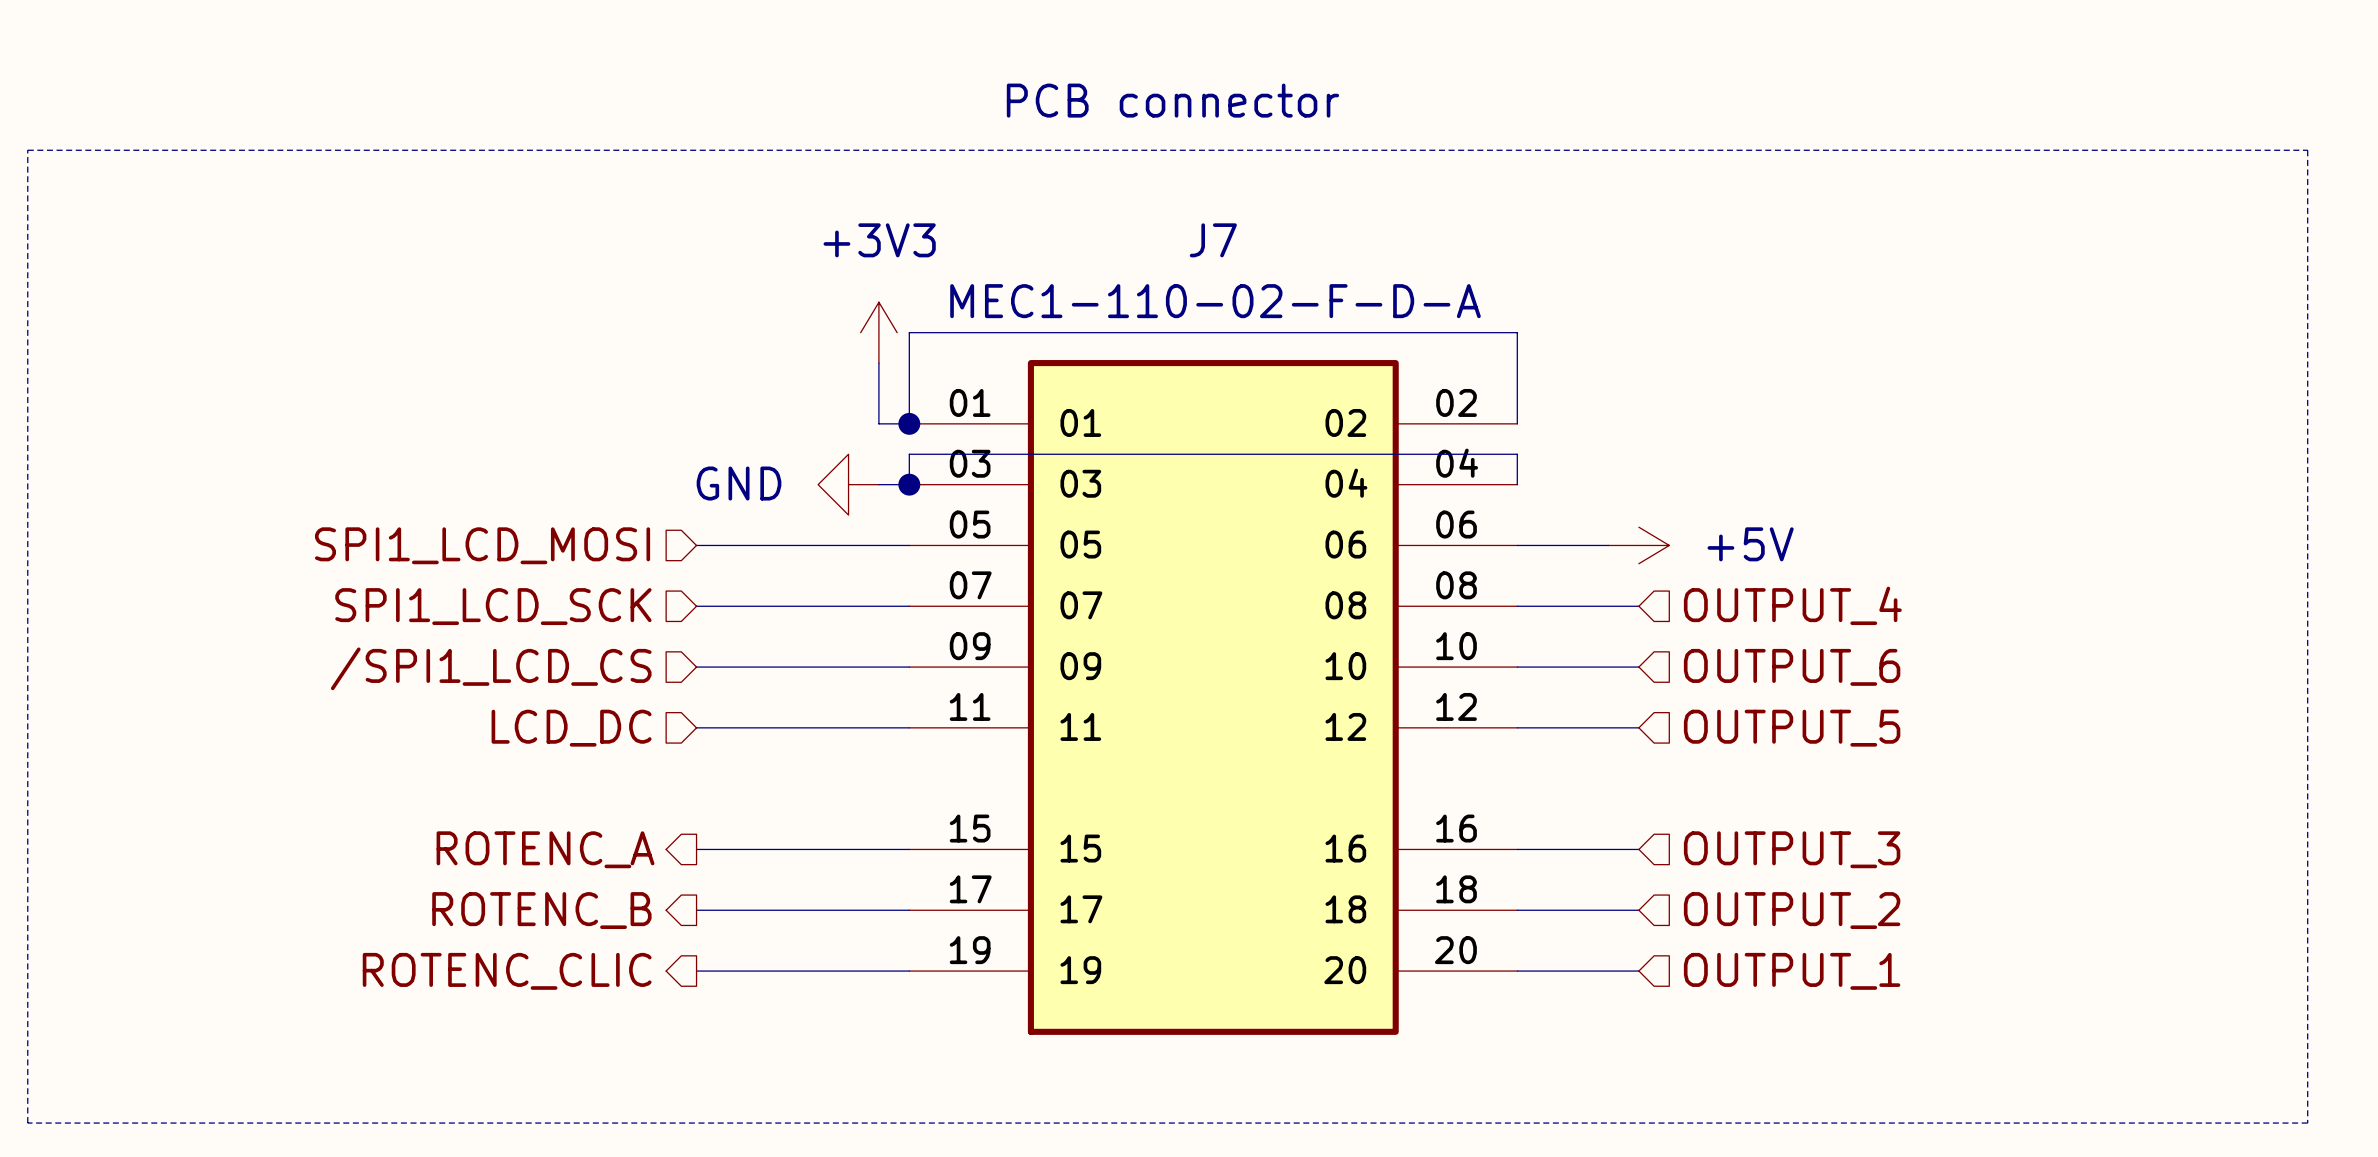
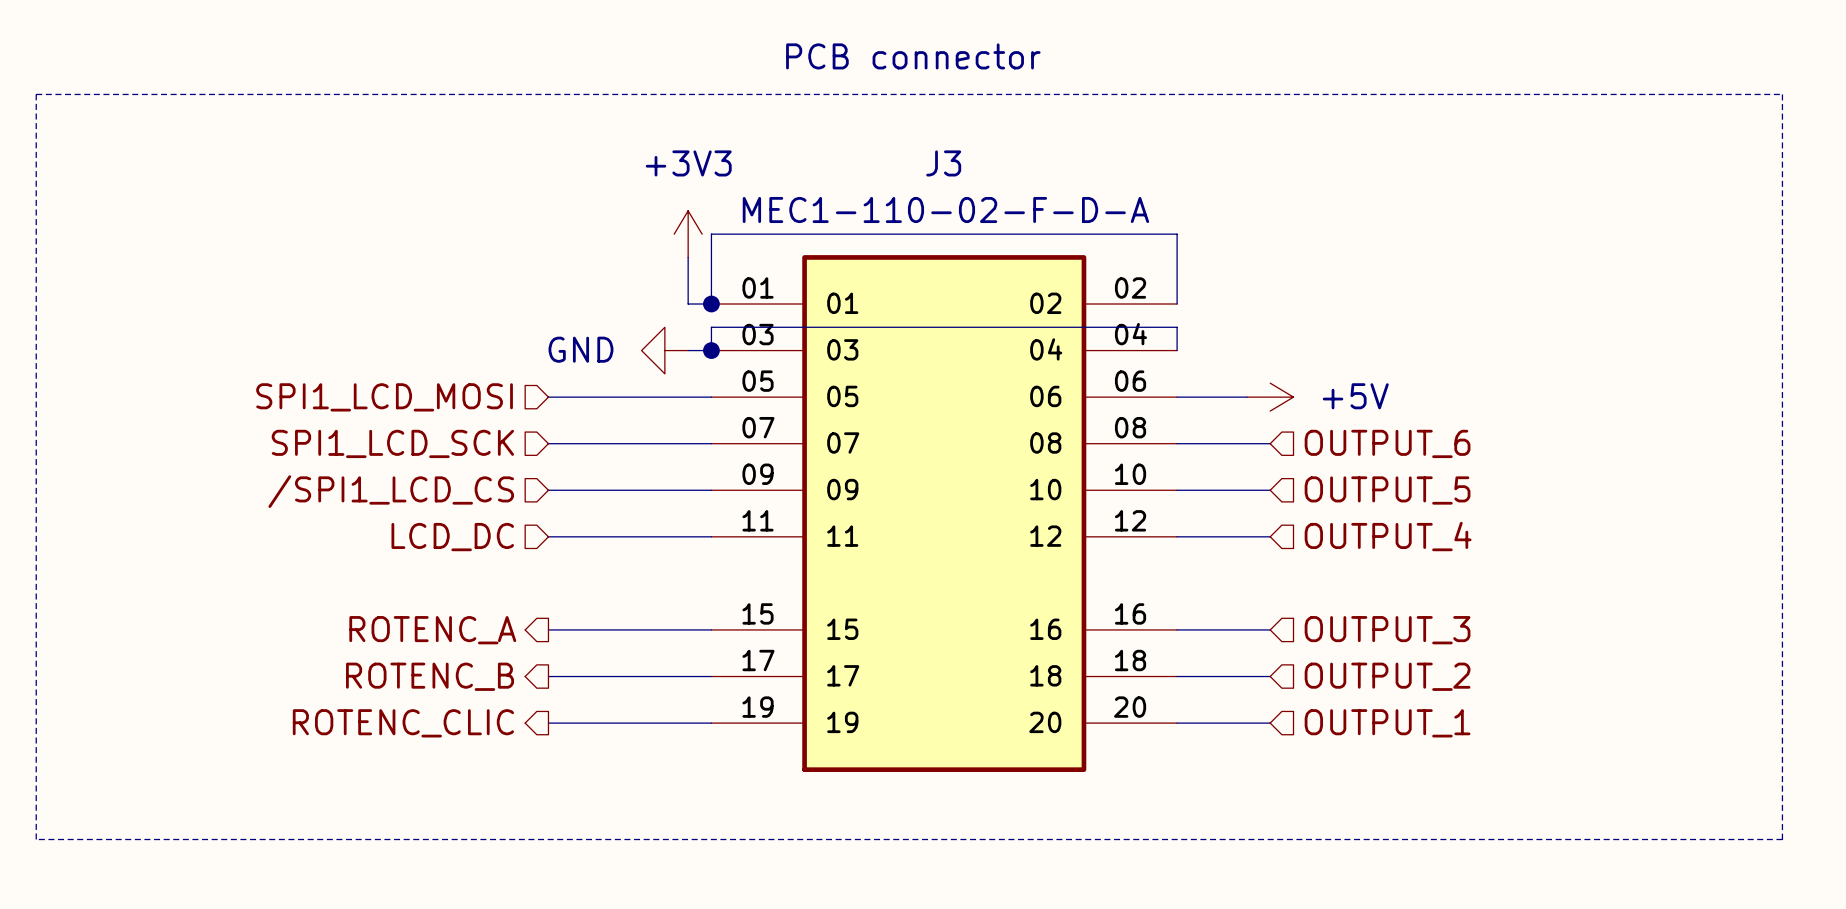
J7 name: J7 (1213, 240) -> J3 (943, 163)
hierarchical label: OUTPUT_4 (1792, 605) -> OUTPUT_6 (1387, 443)
hierarchical label: OUTPUT_6 (1792, 667) -> OUTPUT_5 (1387, 490)
hierarchical label: OUTPUT_5 (1792, 728) -> OUTPUT_4 (1388, 536)

